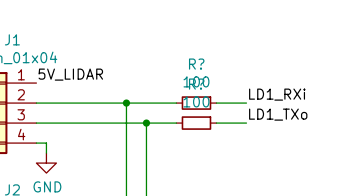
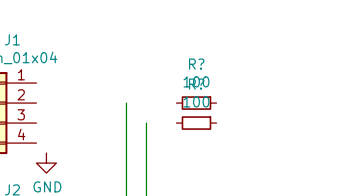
label: 5V_LIDAR (70, 74) -> none
label: LD1_RXi (277, 94) -> none
wire: (36, 103) (176, 103) -> none
junction: (126, 103) -> none
wire: (216, 103) (246, 103) -> none
label: LD1_TXo (278, 114) -> none
wire: (36, 123) (176, 123) -> none
junction: (146, 123) -> none
wire: (216, 123) (246, 123) -> none
wire: (36, 143) (46, 143) (46, 153) -> none

